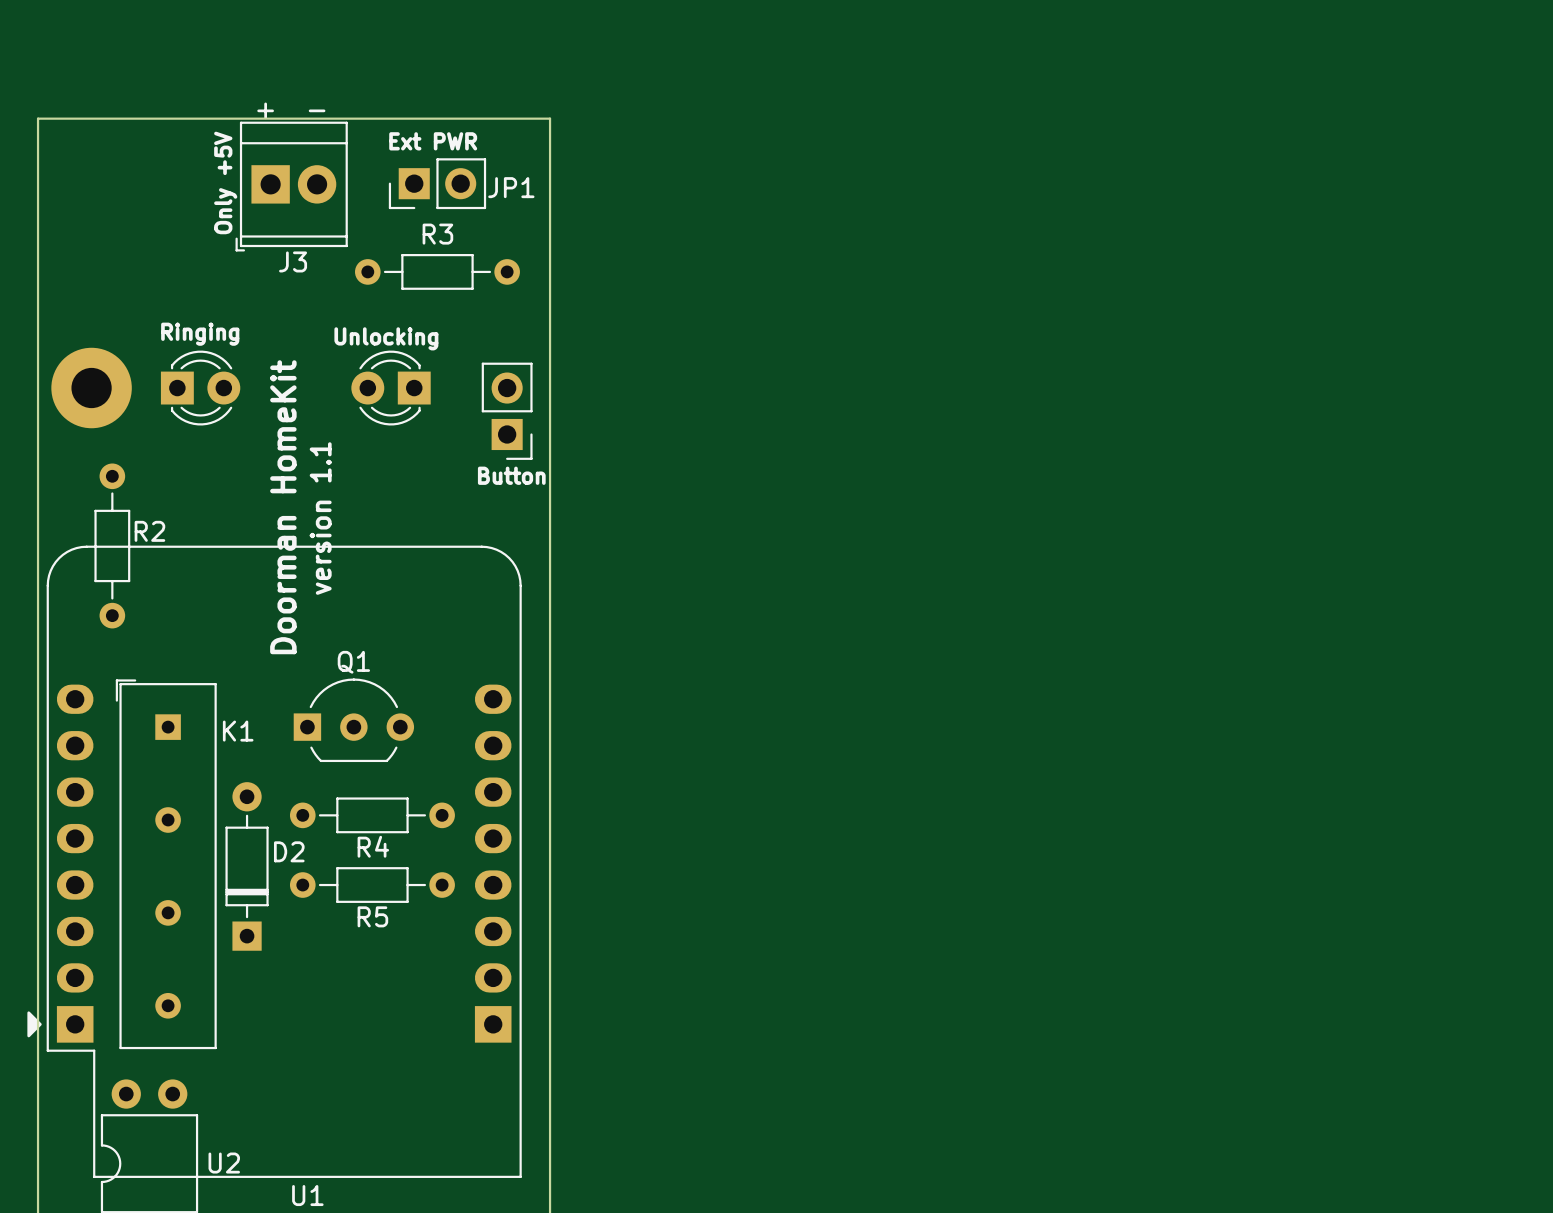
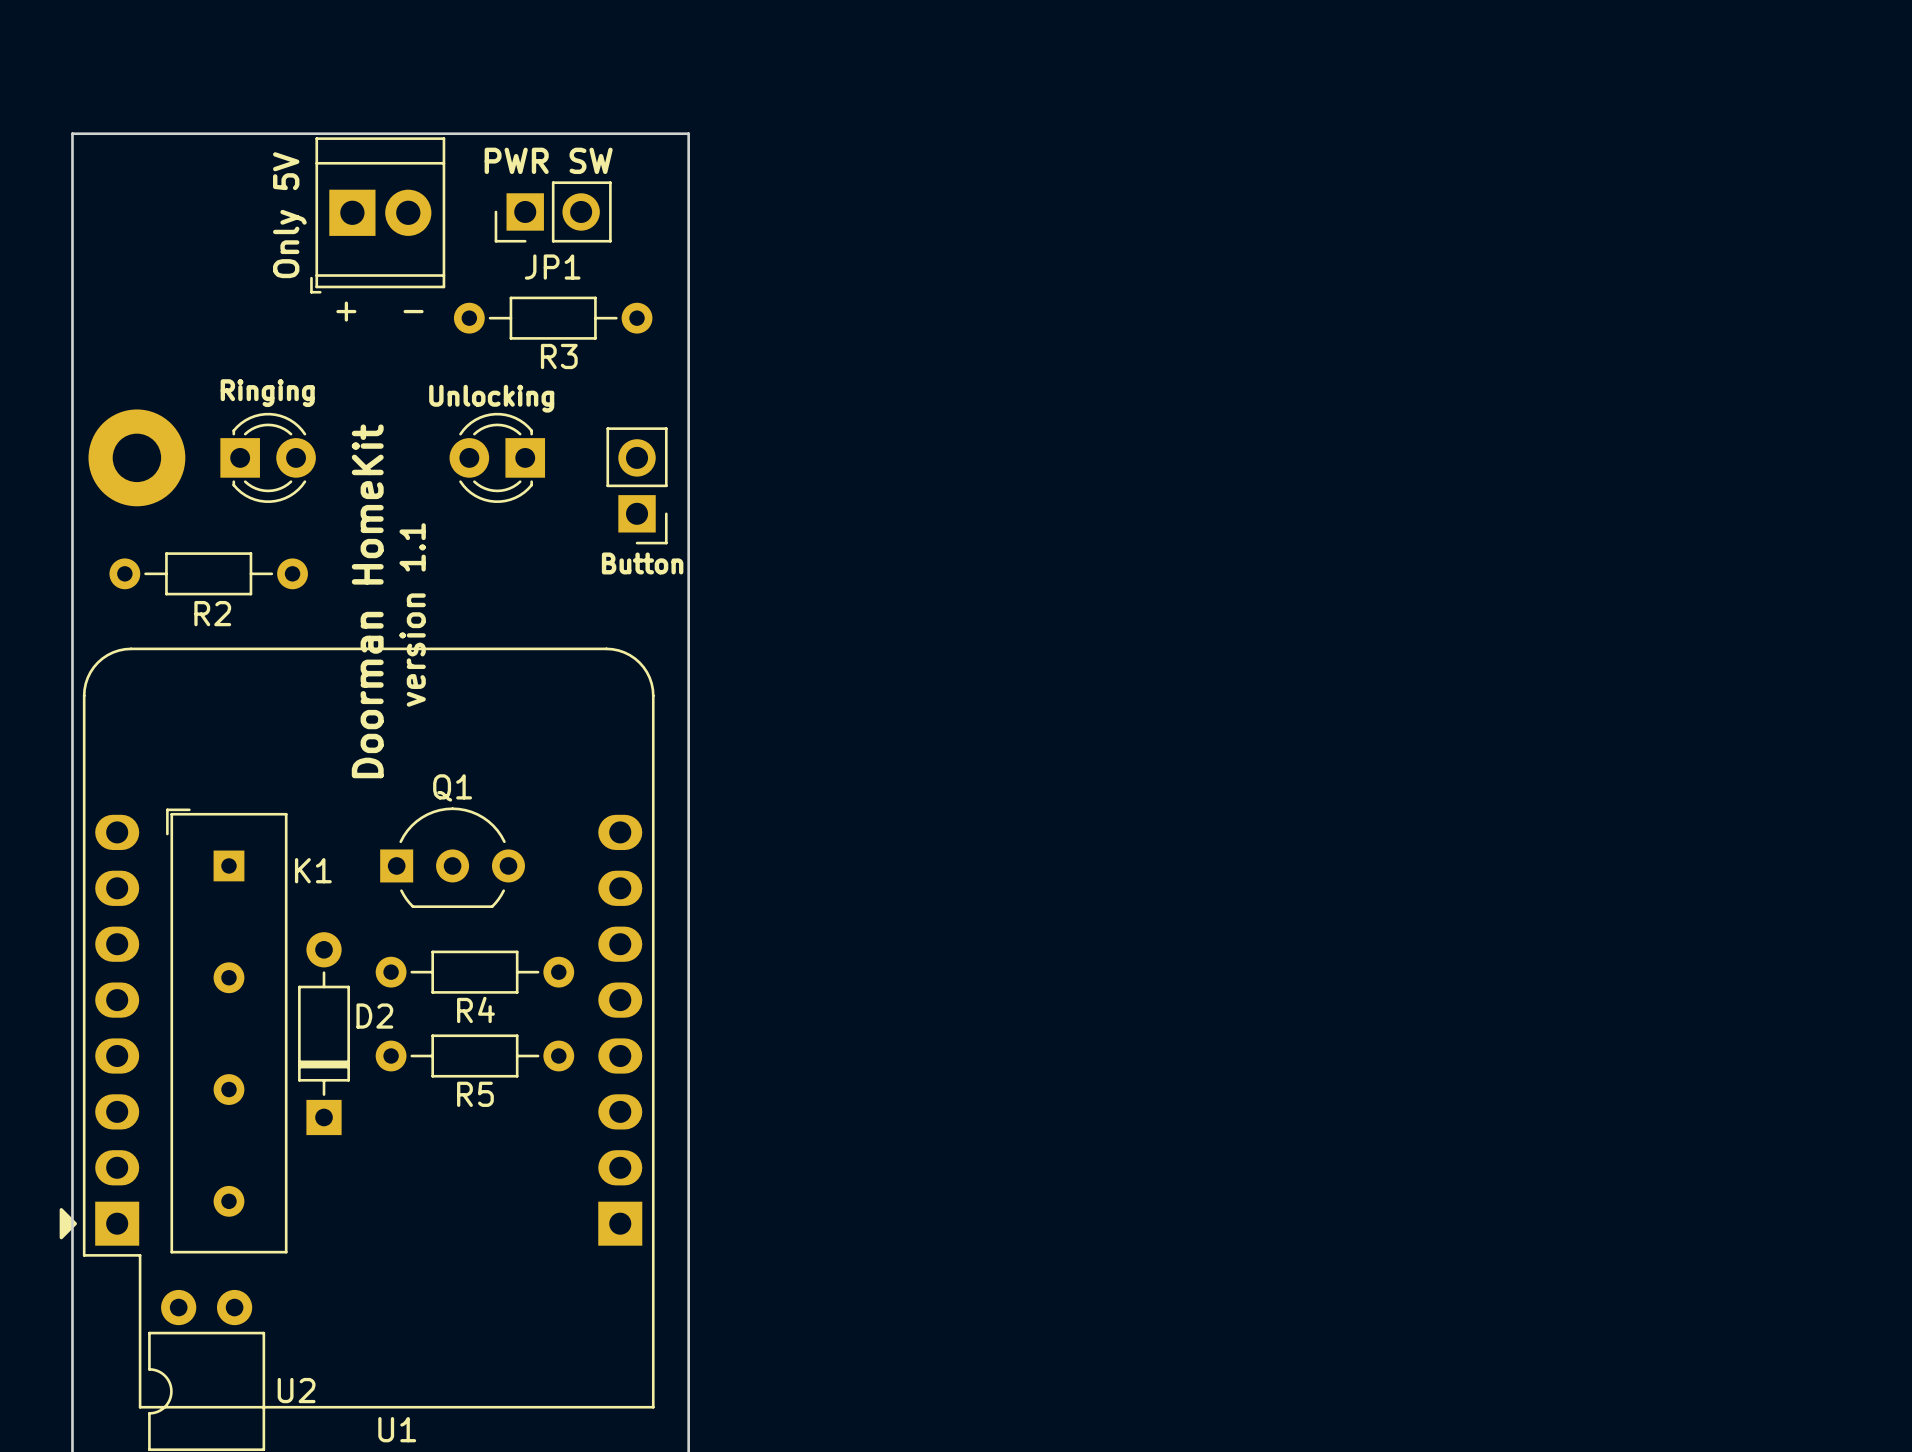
text position: + (265, 110) -> + (346, 311)
text position: - (317, 110) -> - (413, 311)
text: Ext PWR (433, 141) -> PWR SW (548, 160)
text: Only +5V (225, 182) -> Only 5V (289, 215)
JP1 name position: JP1 (511, 187) -> JP1 (552, 267)
R3 name position: R3 (437, 234) -> R3 (559, 356)
J3 name: J3 (293, 261) -> none
R2 rotation: 0° (112, 545) -> 90° clockwise (208, 573)

